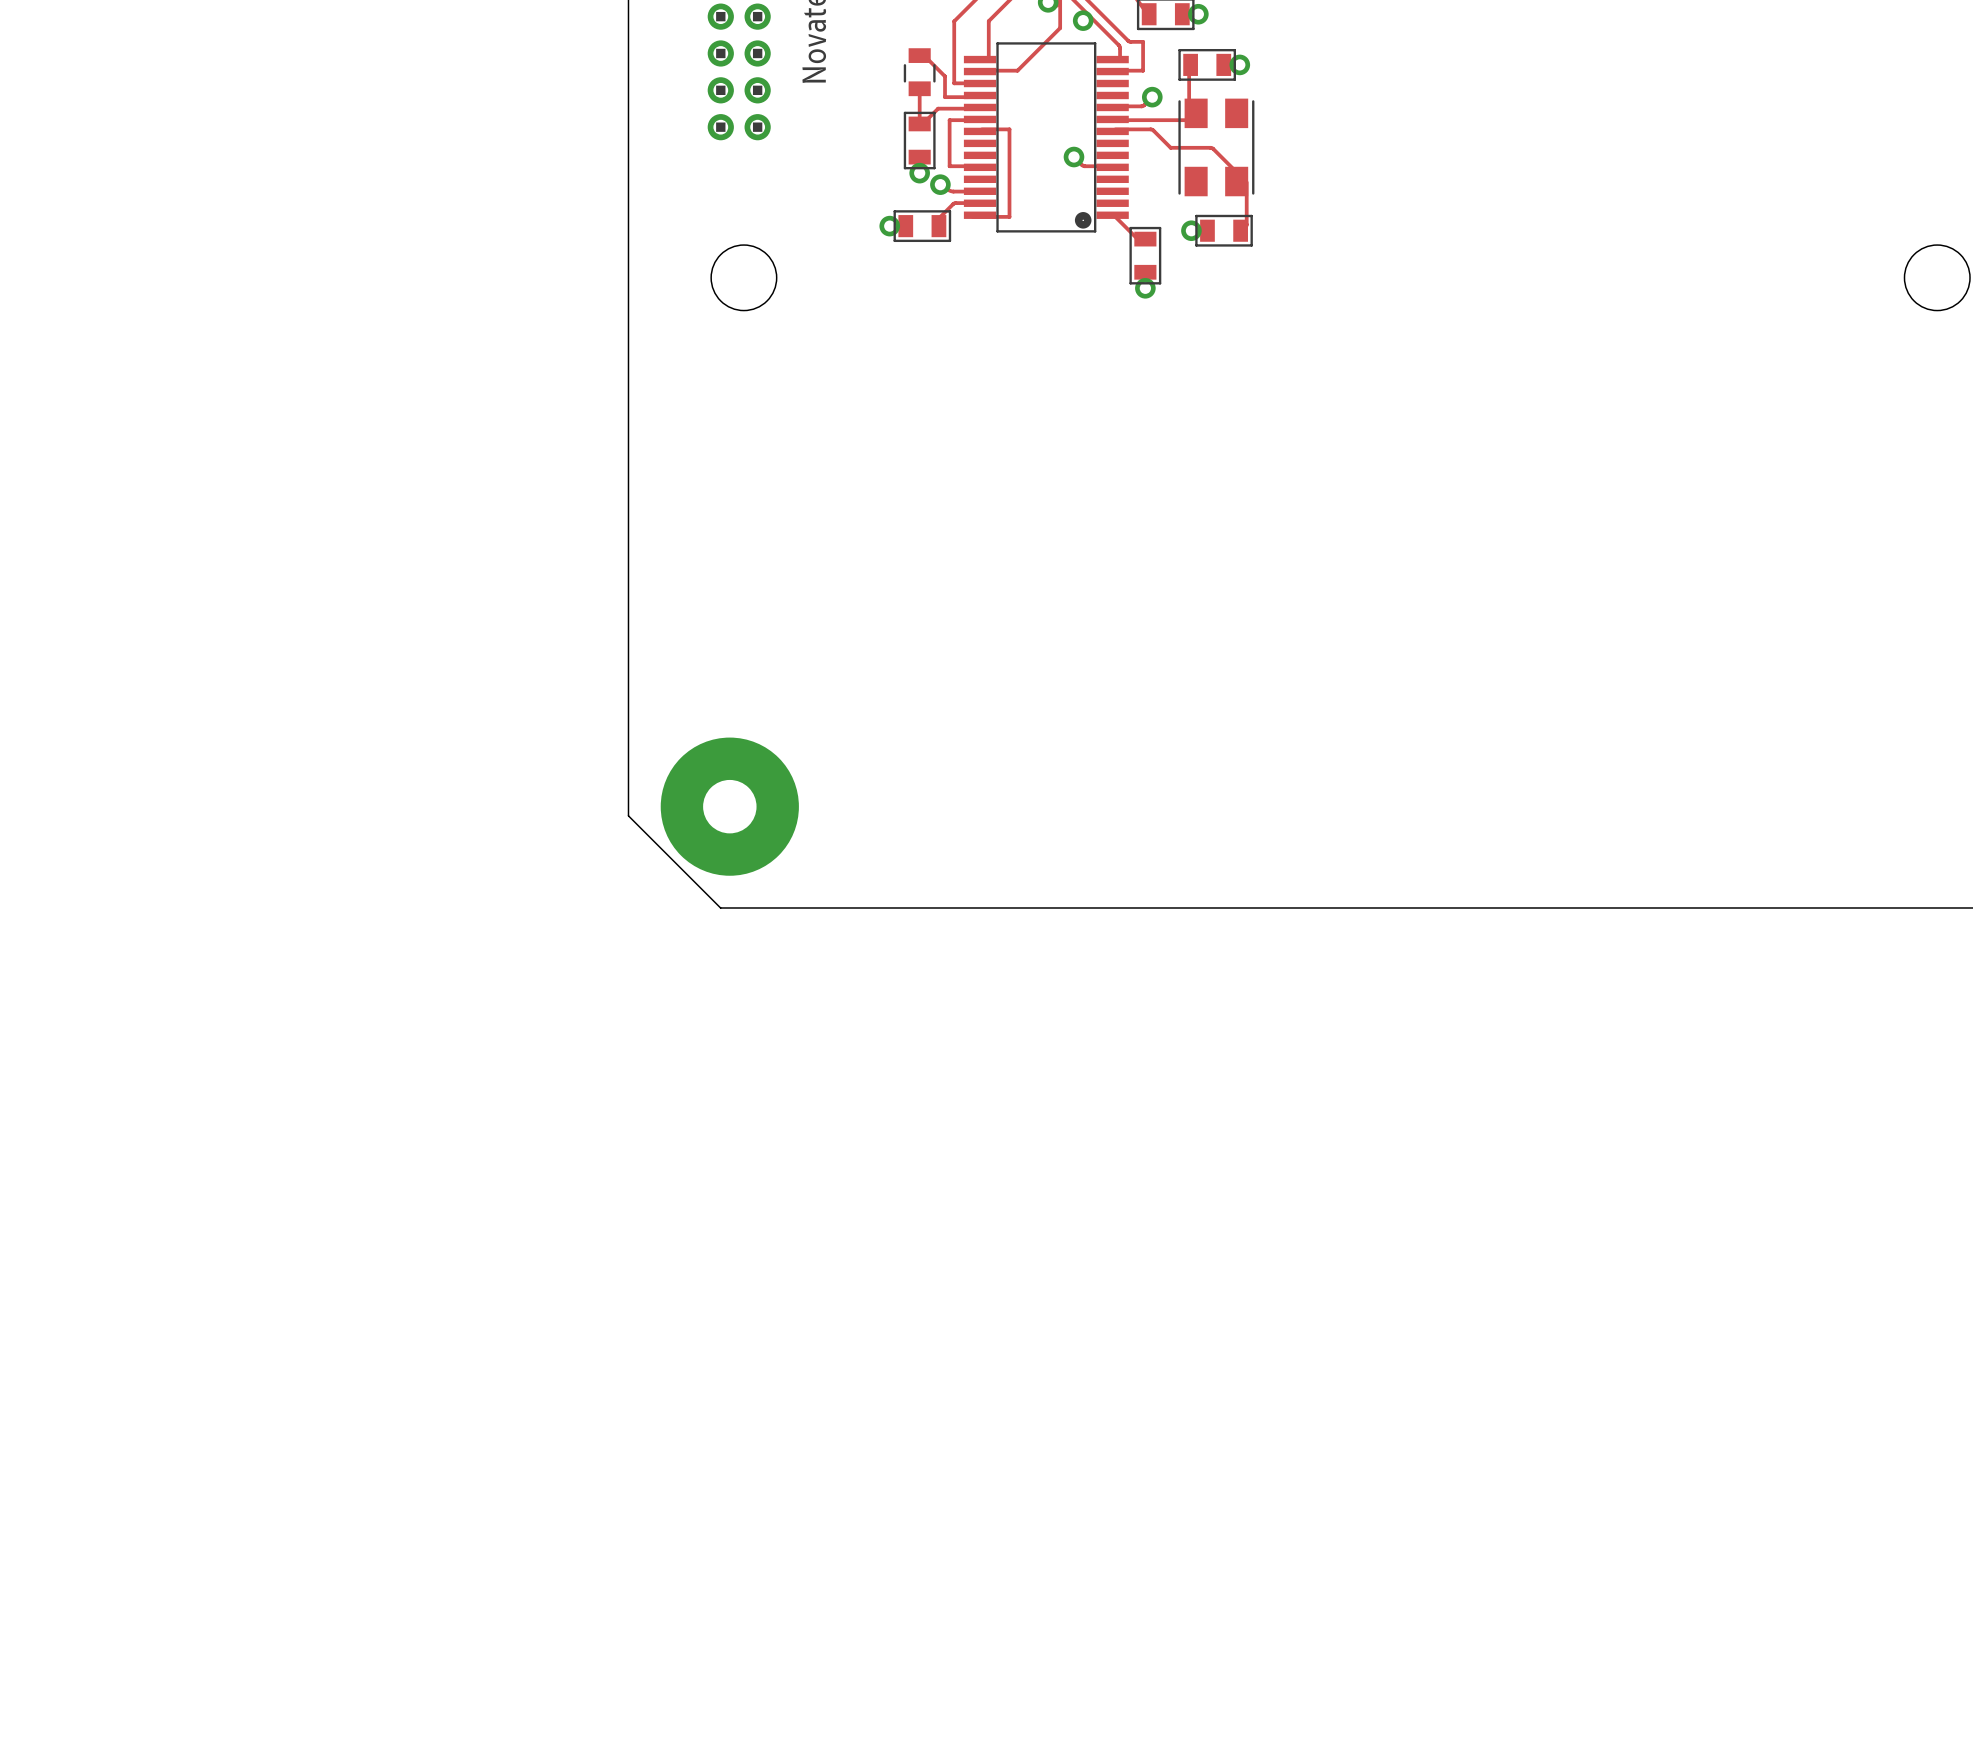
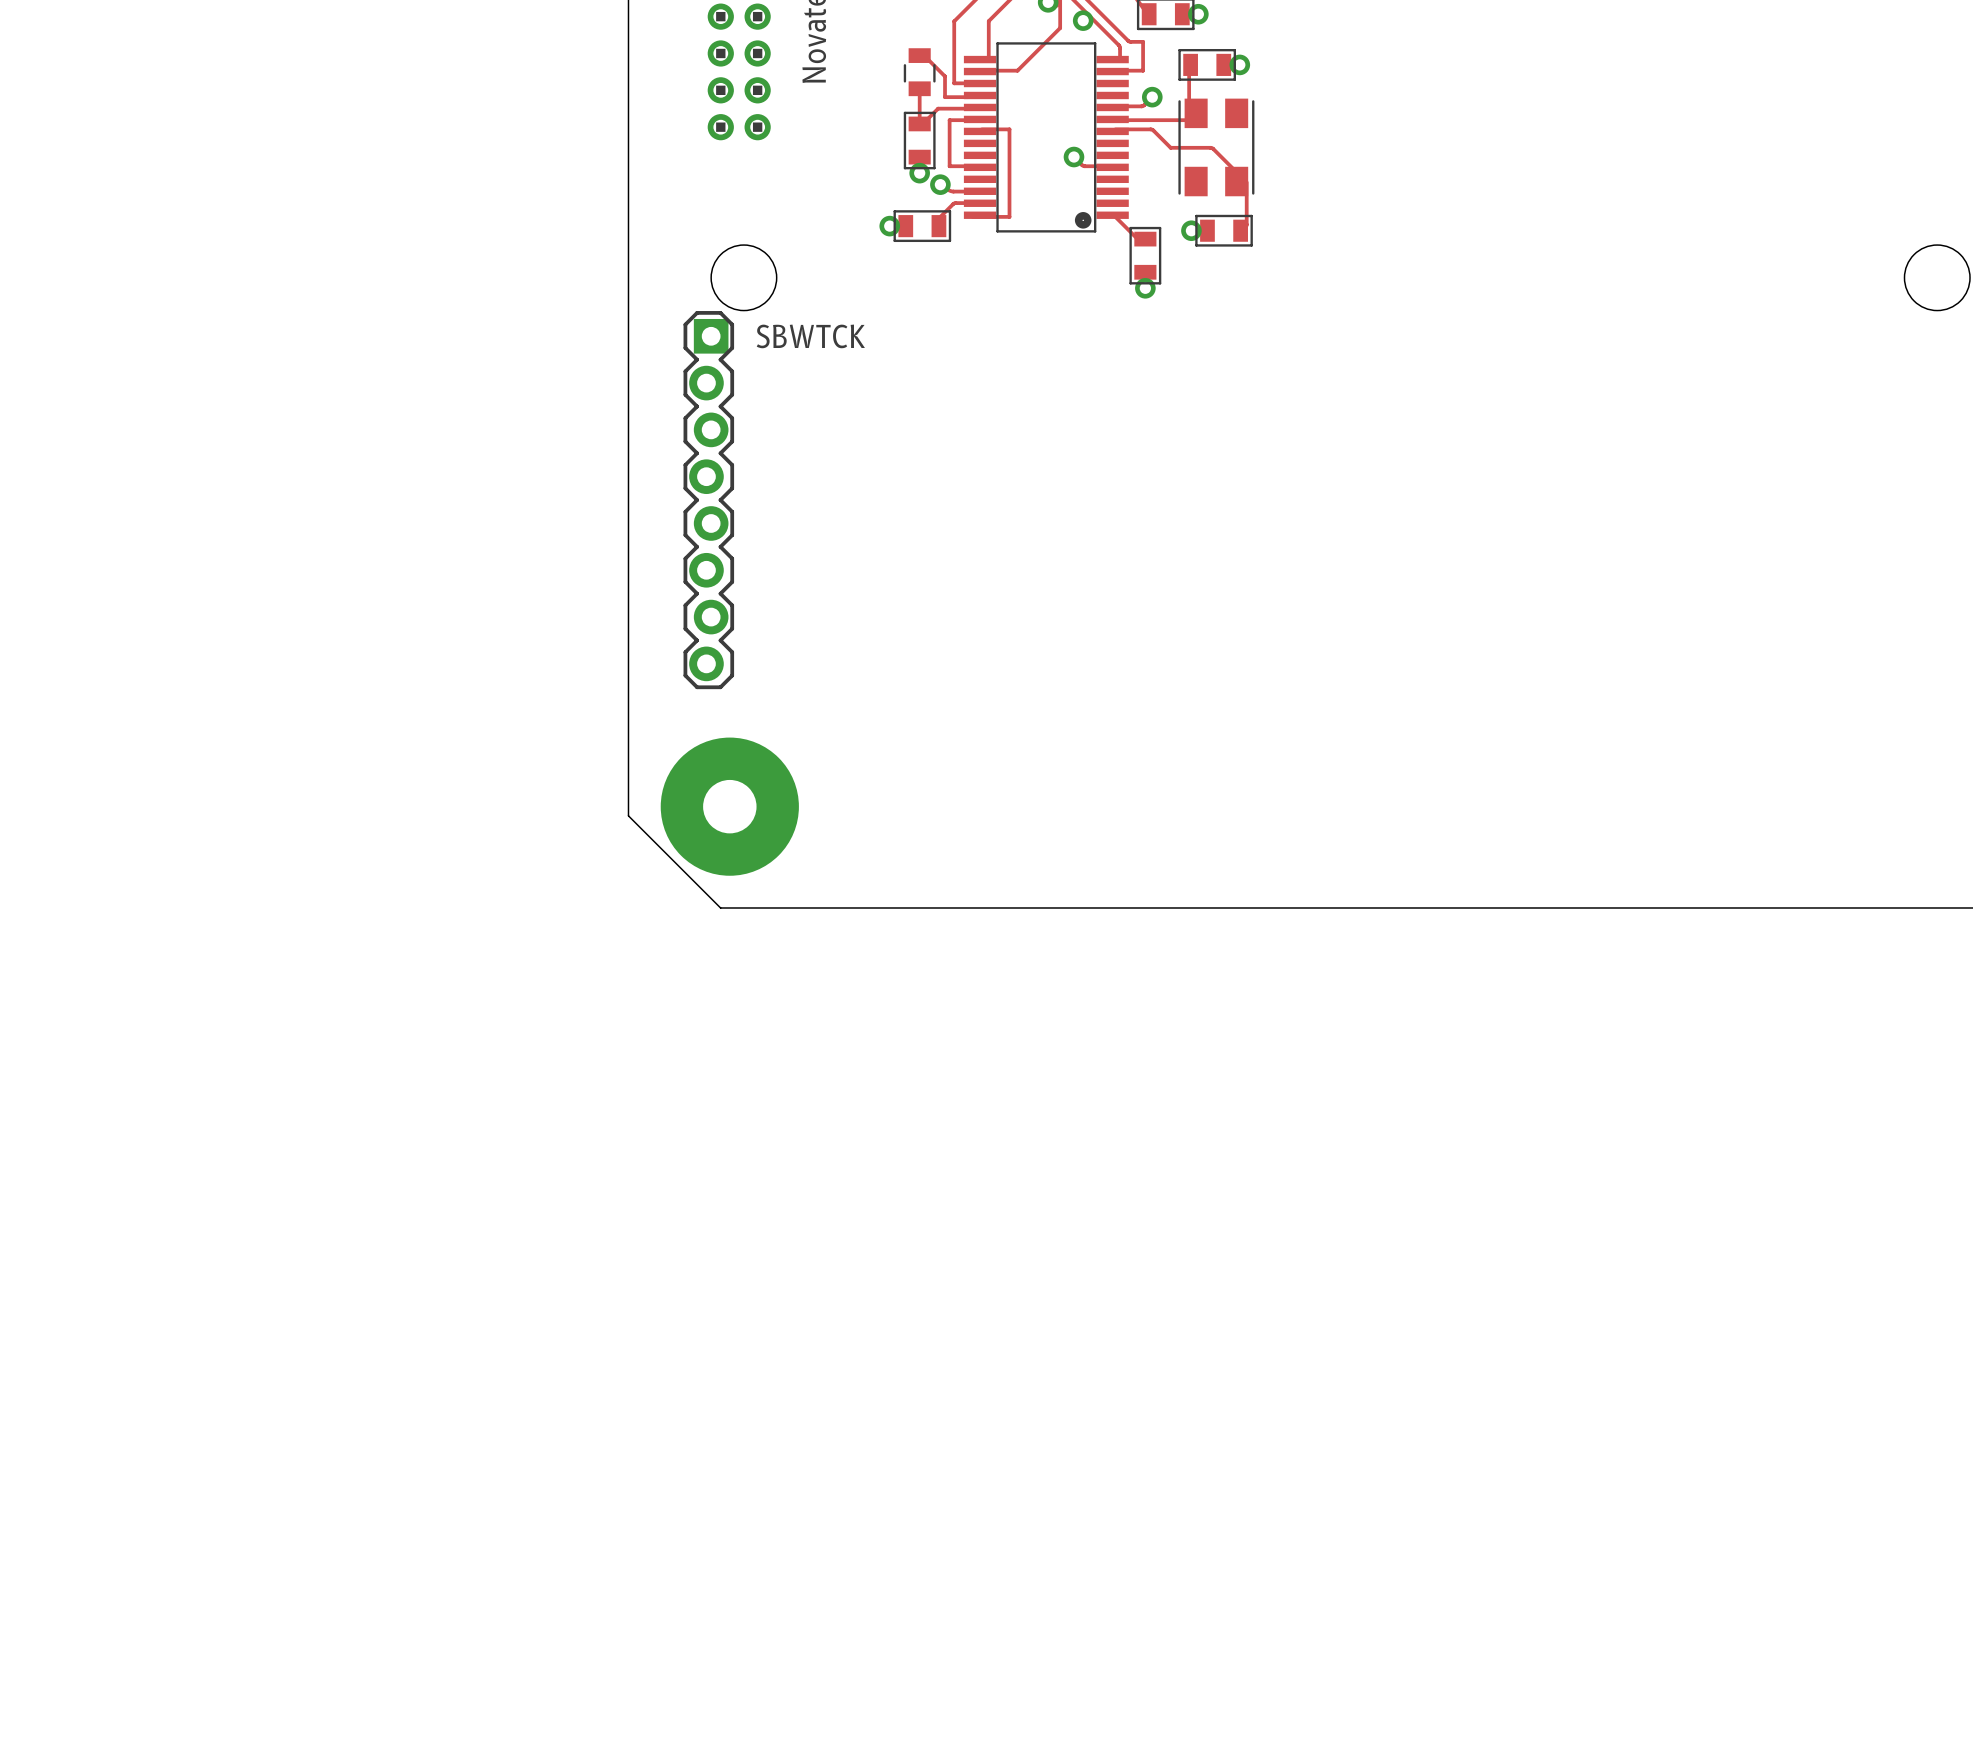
part: none -> (708, 500)

